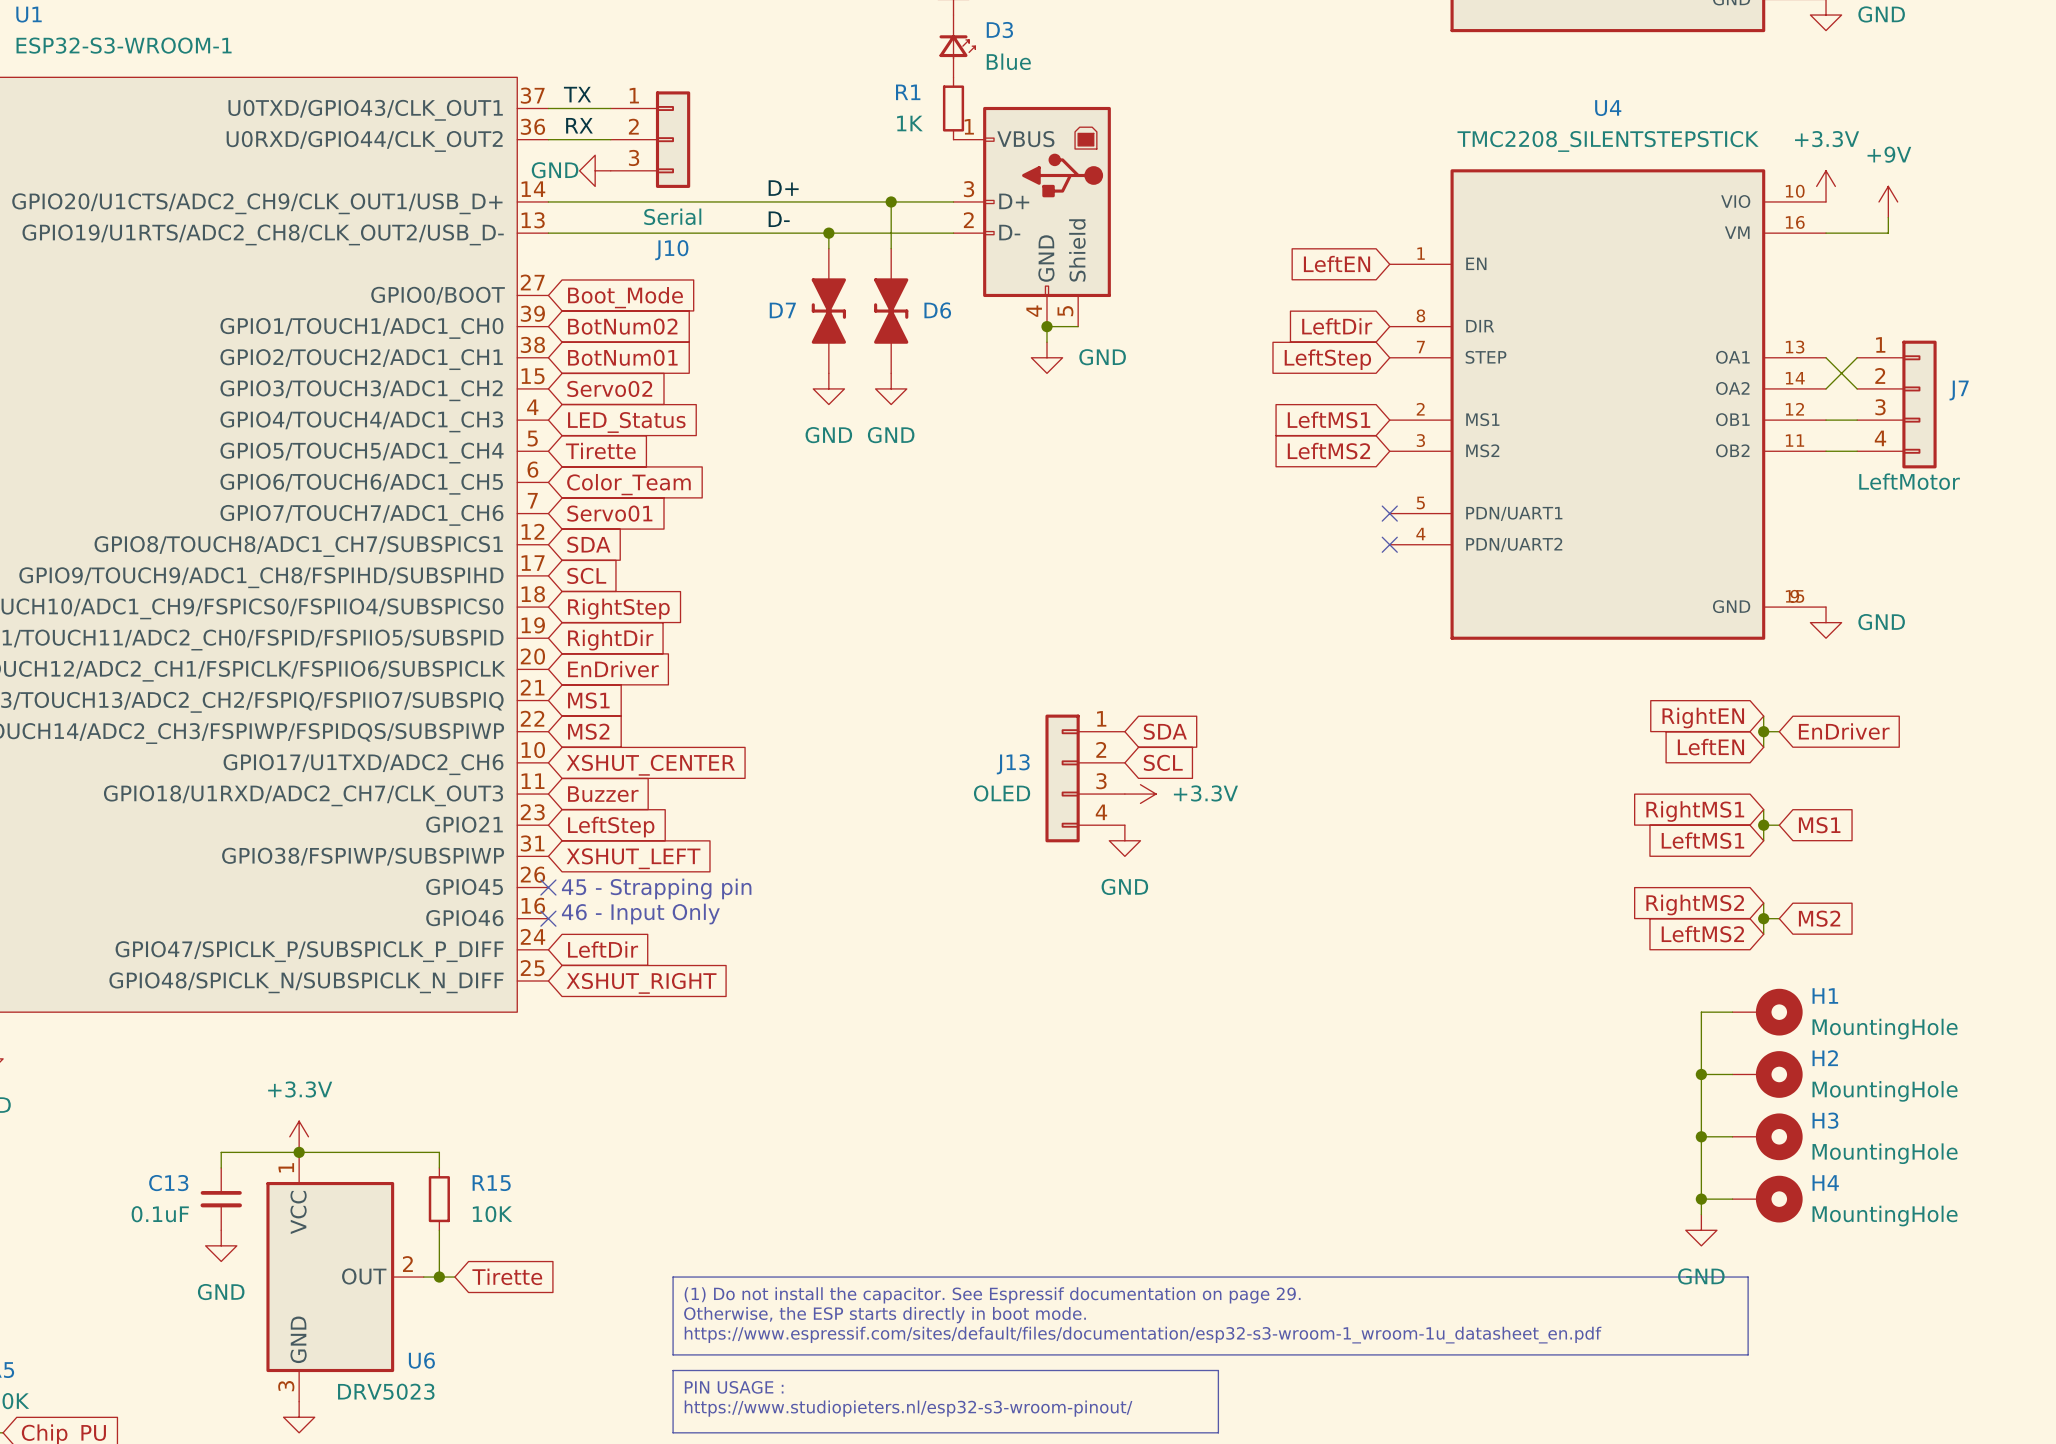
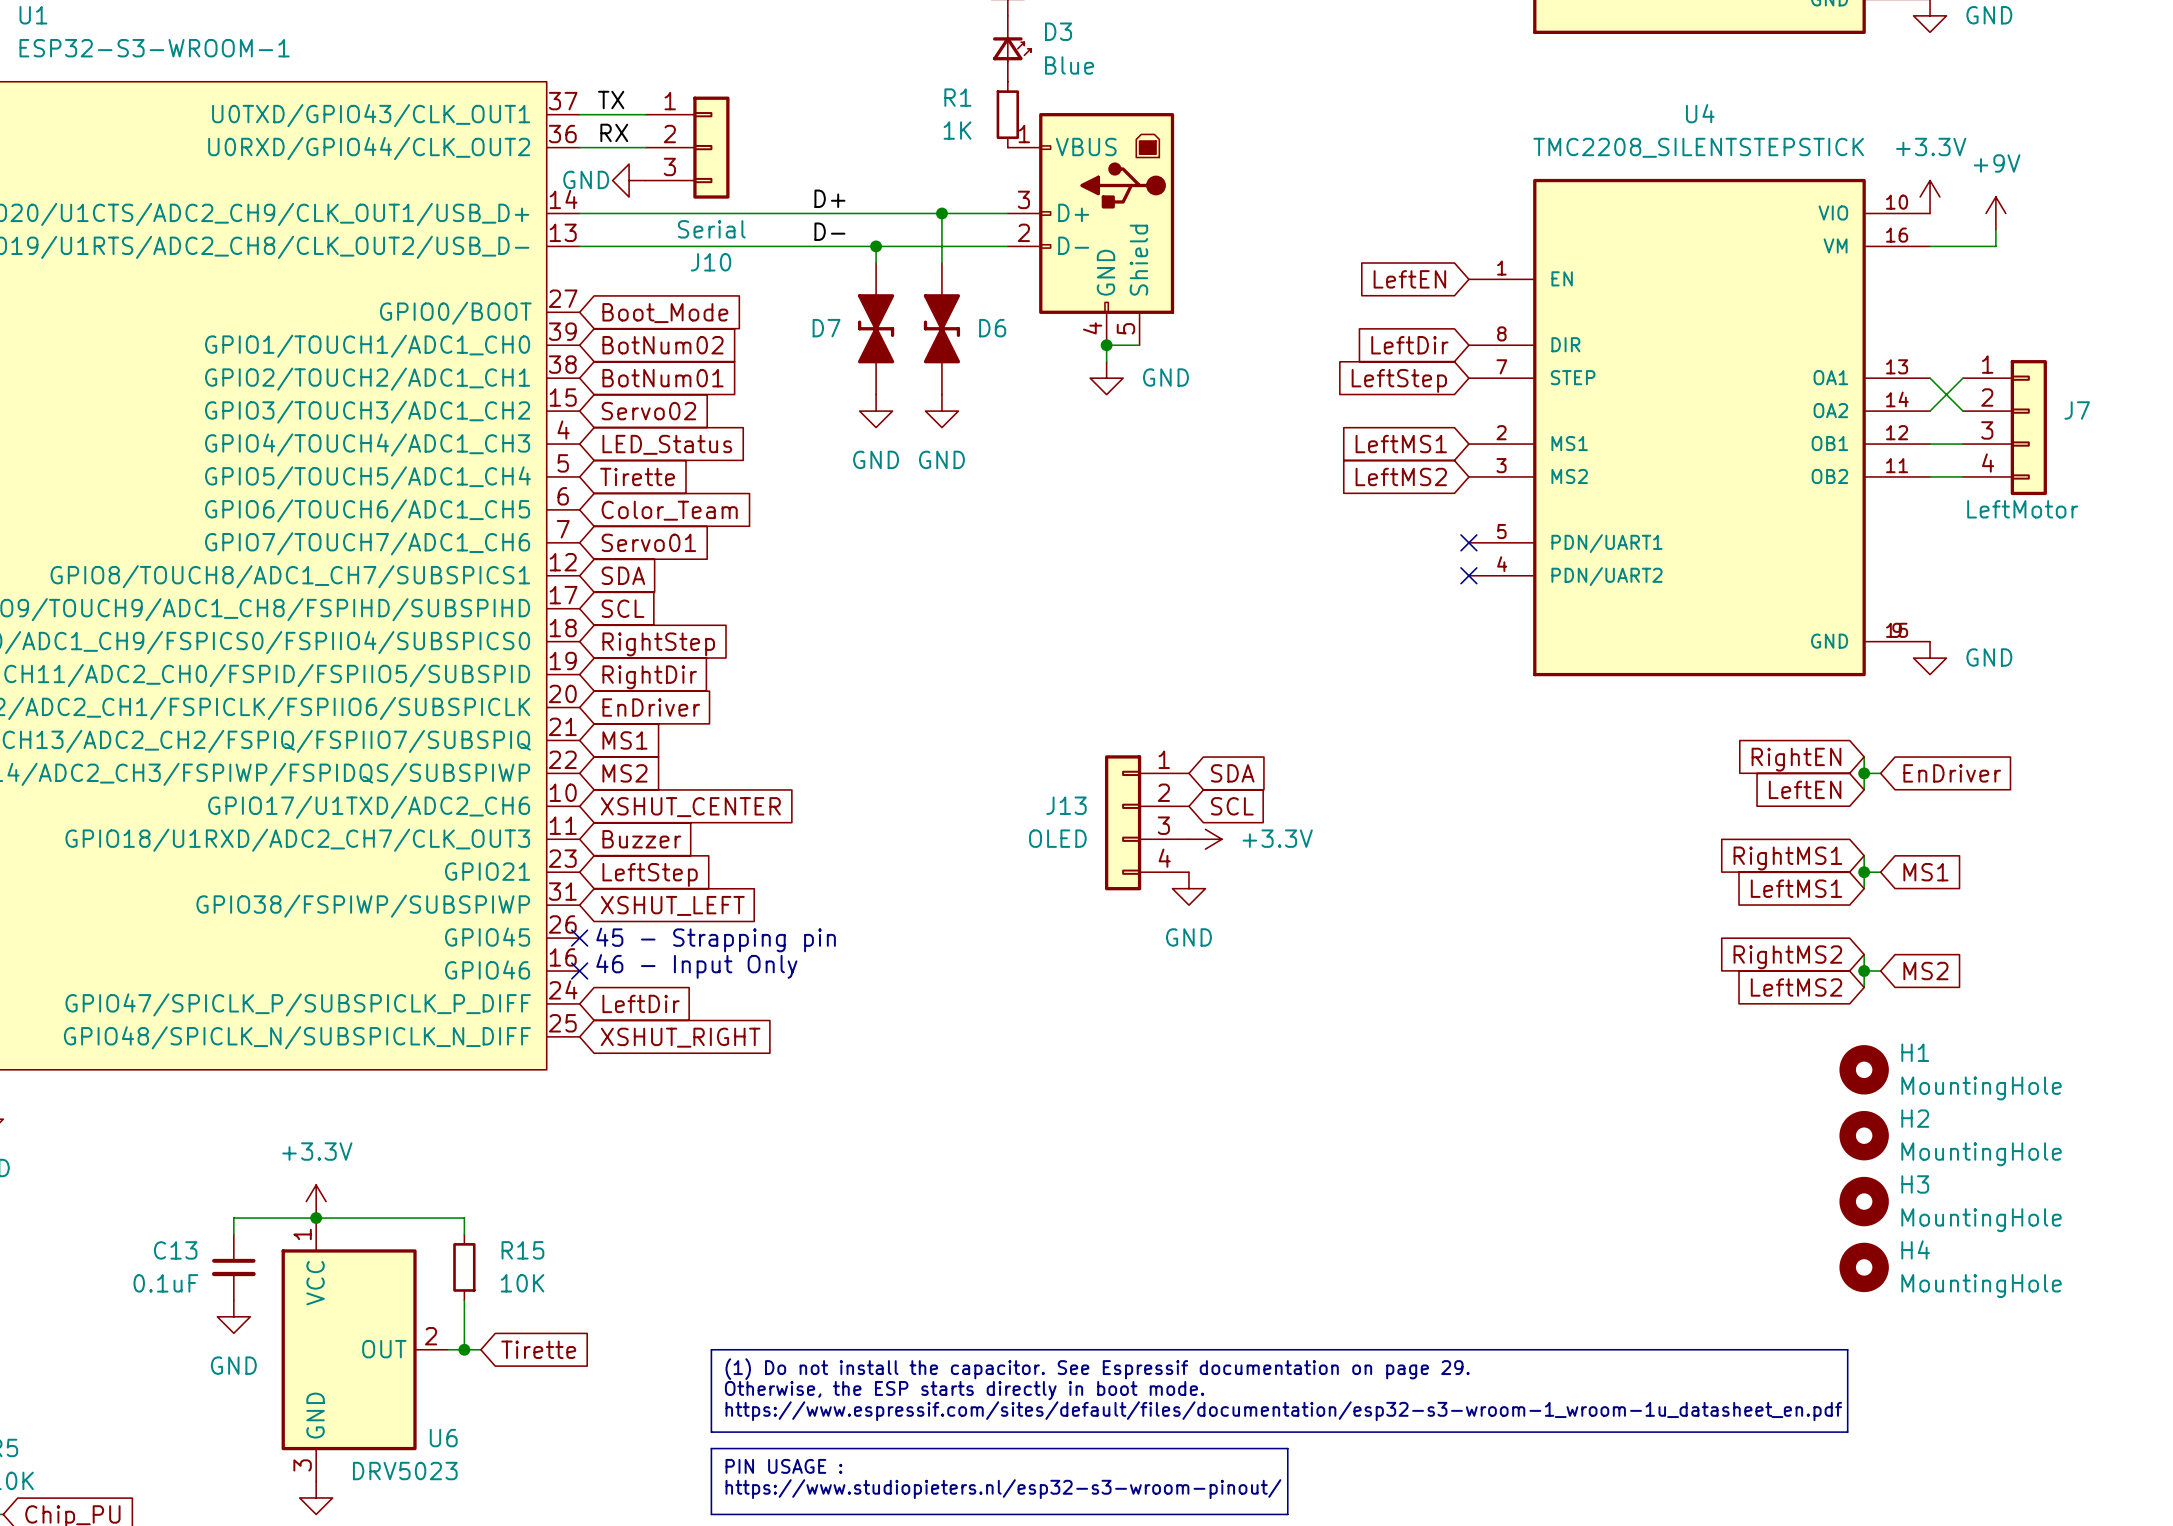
H1 symbol: [1732, 988, 1803, 1036] -> [1839, 1045, 1889, 1095]
wire: (1732, 1012) (1701, 1012) (1701, 1214) -> none
H2 symbol: [1732, 1051, 1803, 1098] -> [1839, 1110, 1889, 1161]
wire: (1701, 1074) (1732, 1074) -> none
junction: (1701, 1074) -> none
H3 symbol: [1732, 1113, 1803, 1161] -> [1839, 1176, 1889, 1227]
wire: (1701, 1136) (1732, 1136) -> none
junction: (1701, 1136) -> none
H4 symbol: [1732, 1175, 1803, 1223] -> [1839, 1242, 1889, 1293]
wire: (1701, 1199) (1732, 1199) -> none
junction: (1701, 1199) -> none
power symbol: GND (1701, 1230) -> none

